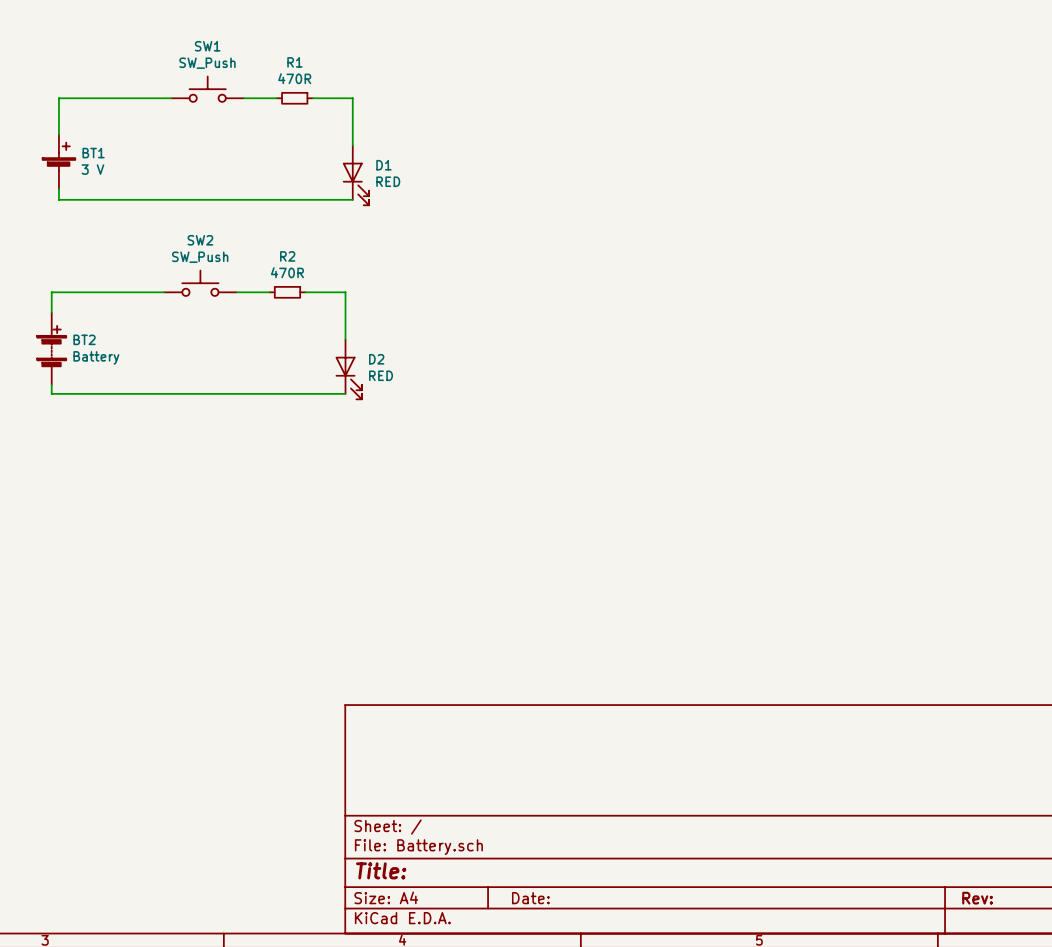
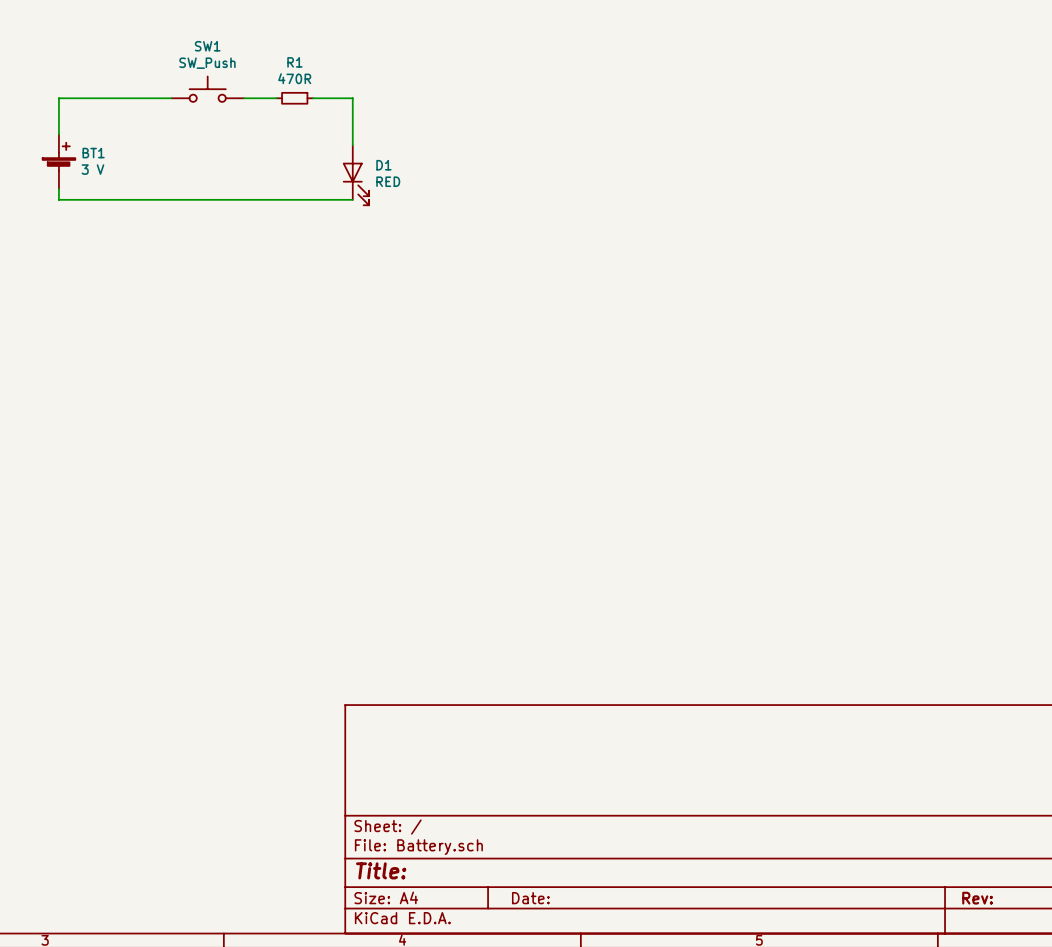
SW2: SW_Push (200, 283) -> none
wire: (164, 292) (51, 292) (51, 312) -> none
wire: (236, 292) (269, 292) -> none
R2: 470R (287, 292) -> none
wire: (305, 292) (345, 292) (345, 339) -> none
BT2: Battery (51, 348) -> none
D2: RED (348, 369) -> none
wire: (51, 384) (51, 393) (345, 393) -> none

